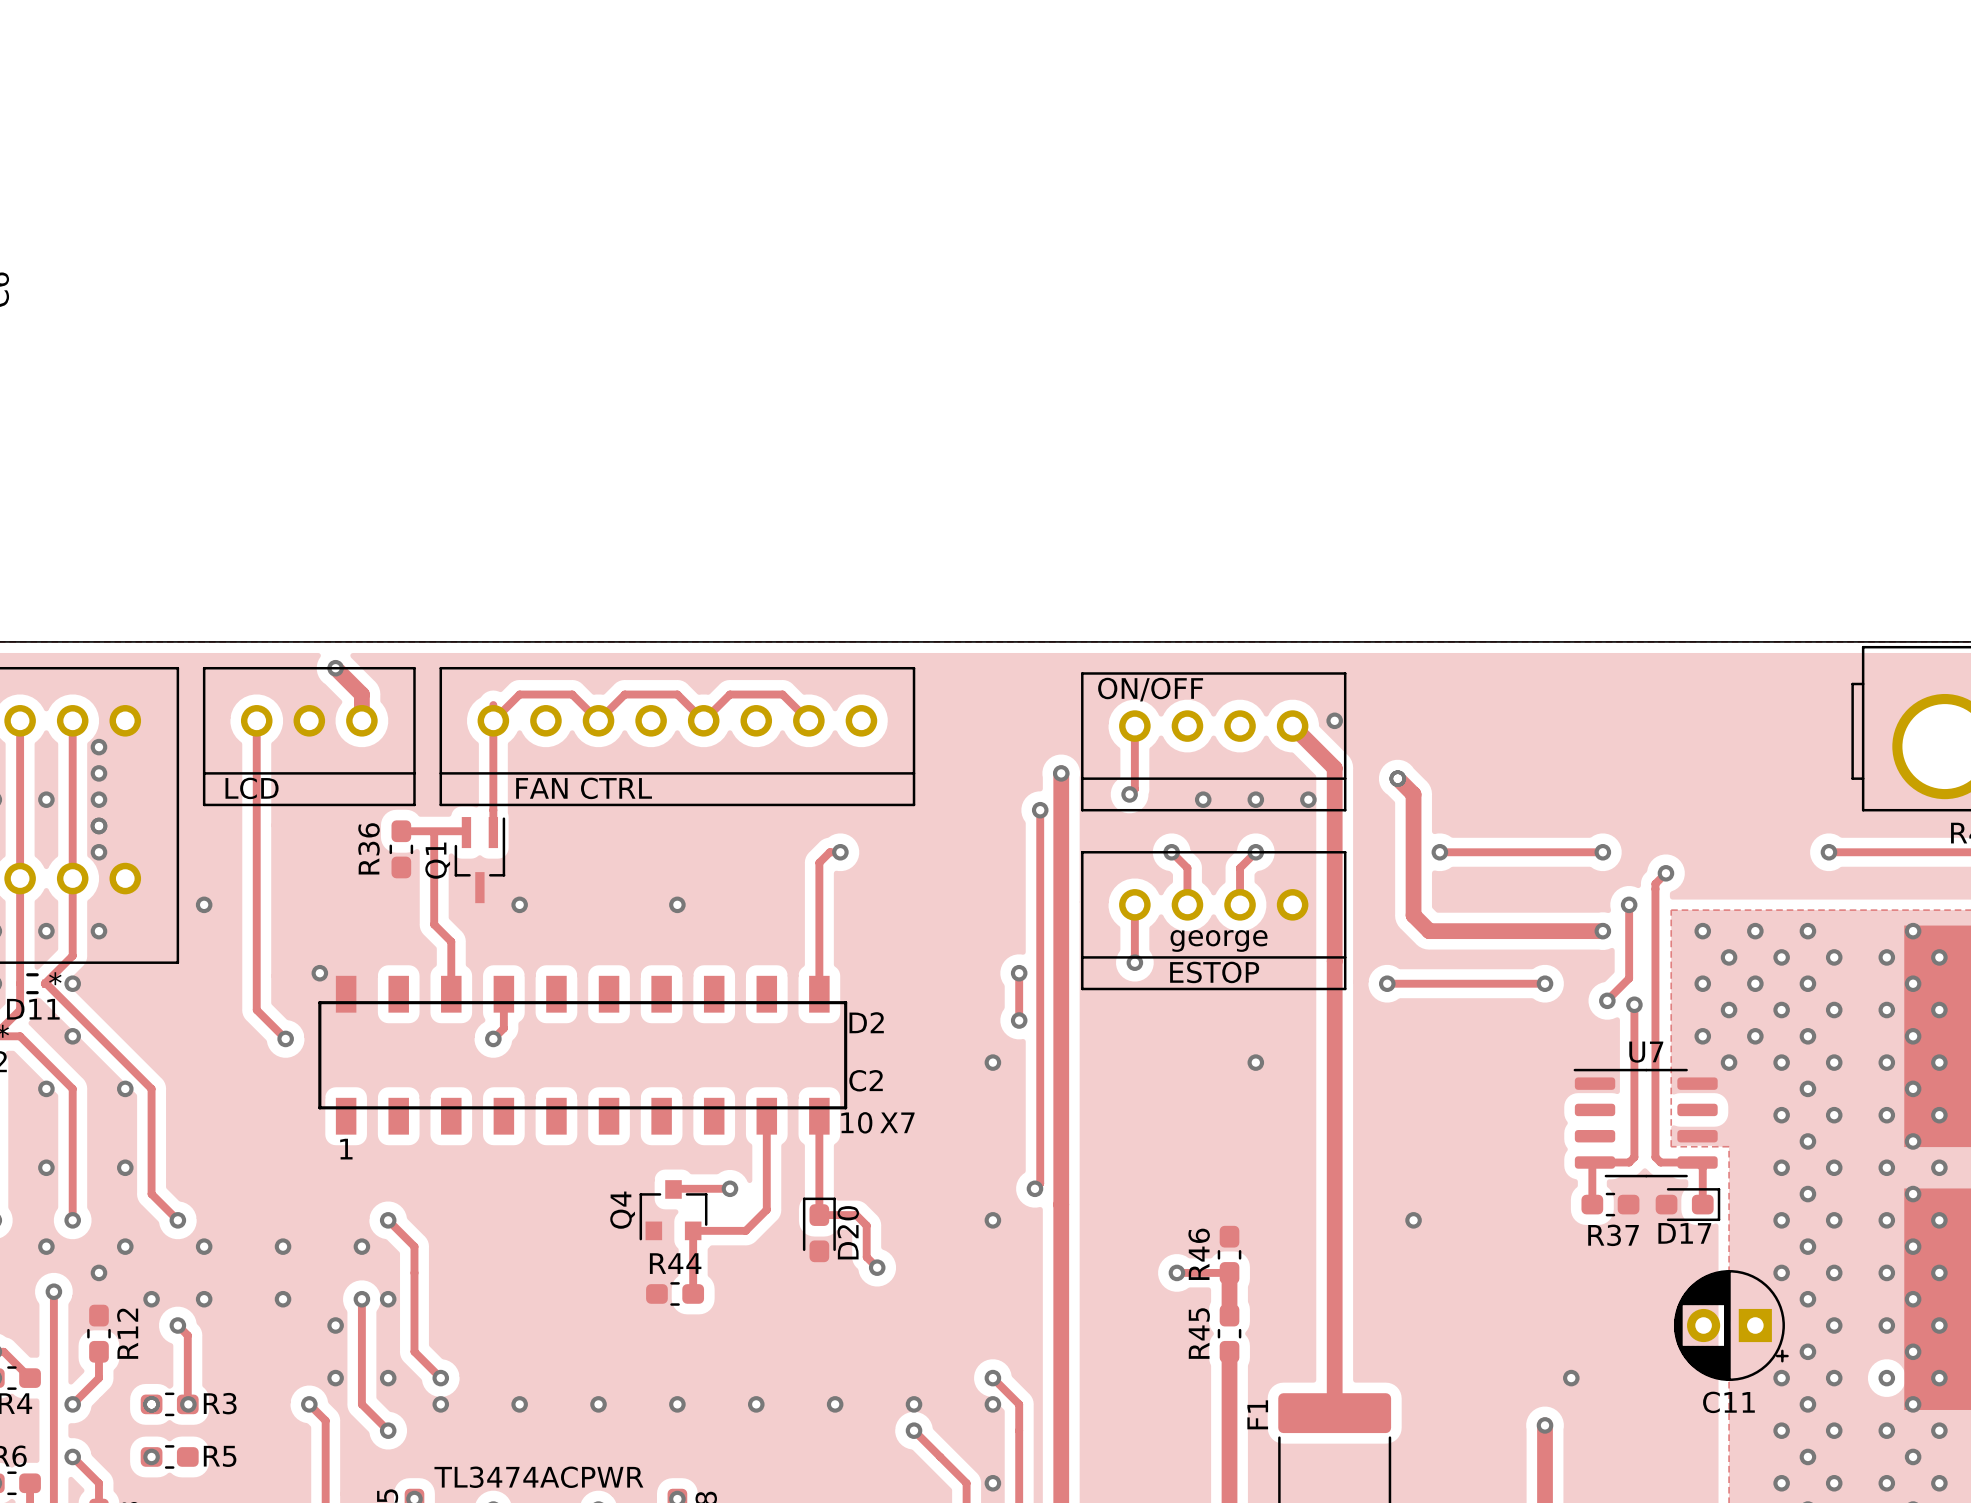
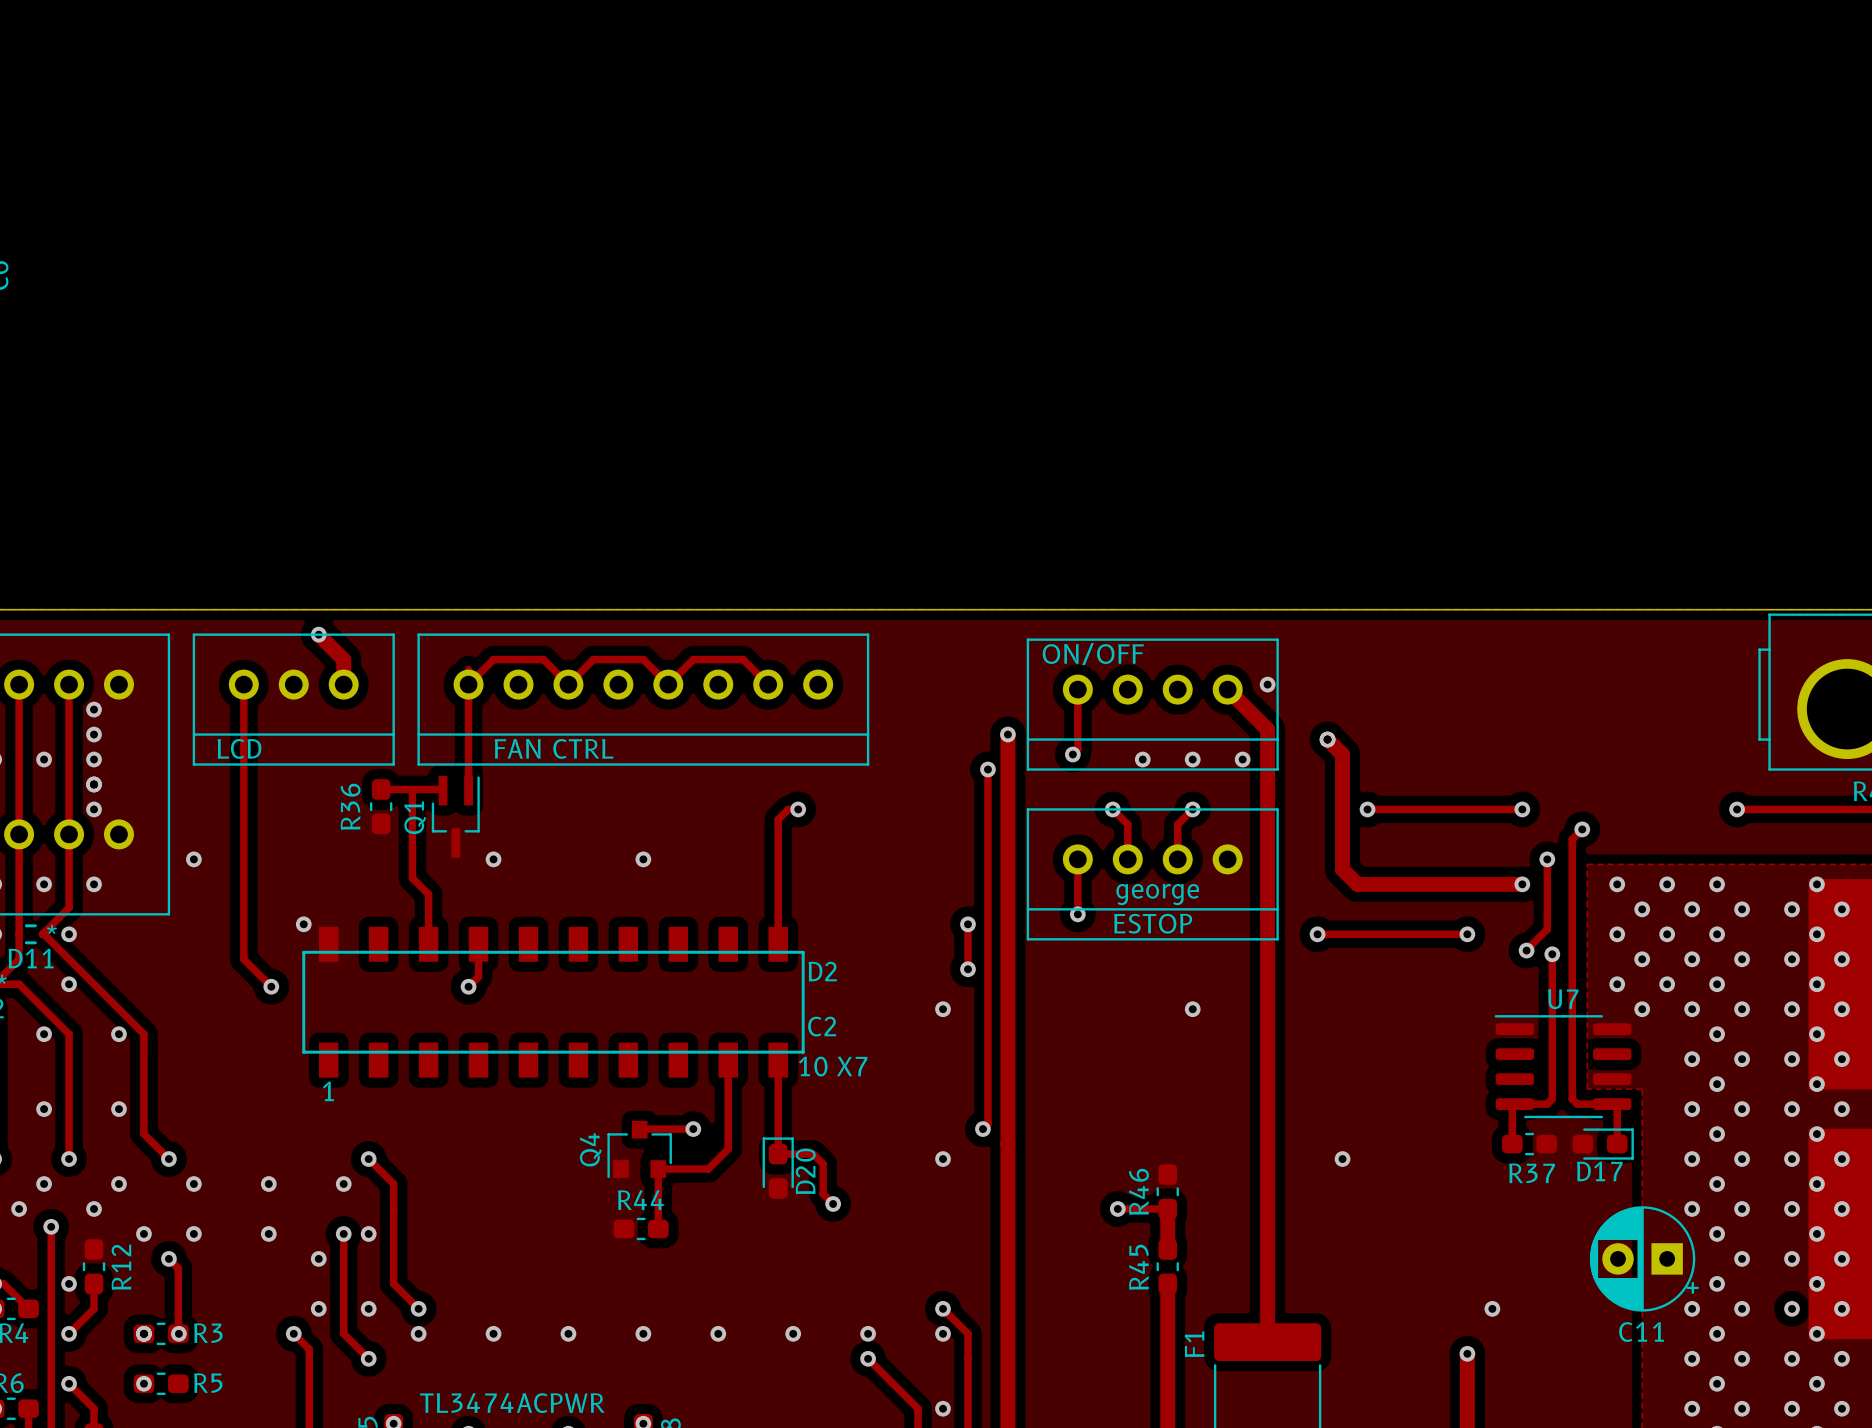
via: none -> (19, 1208)
via: none -> (69, 1283)

